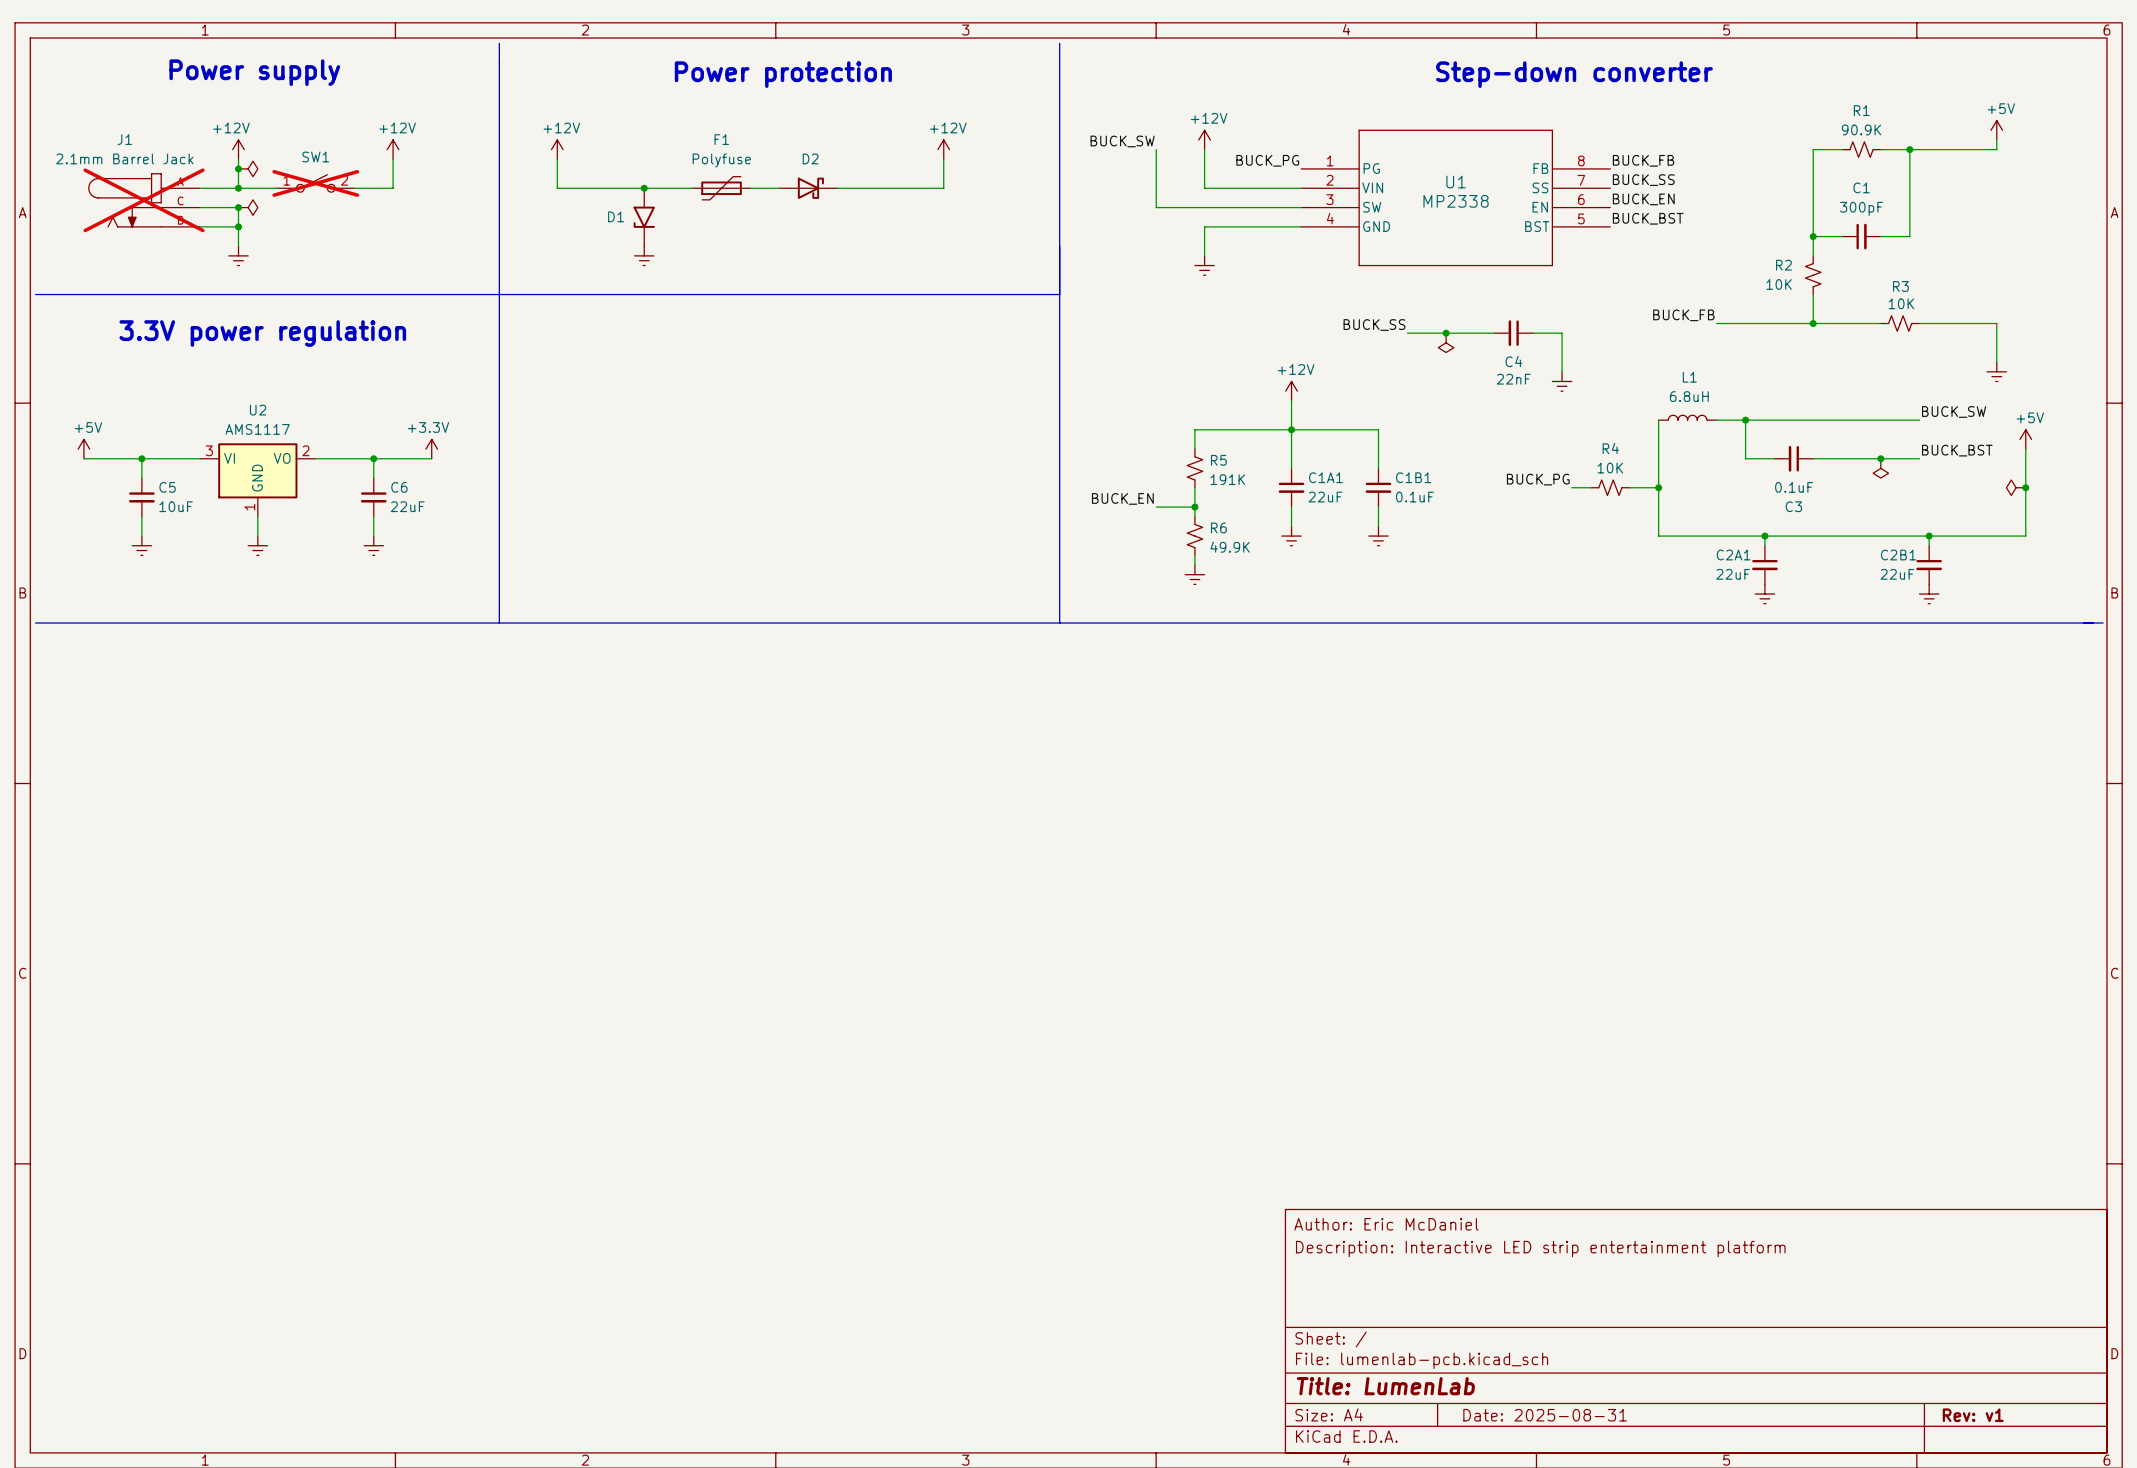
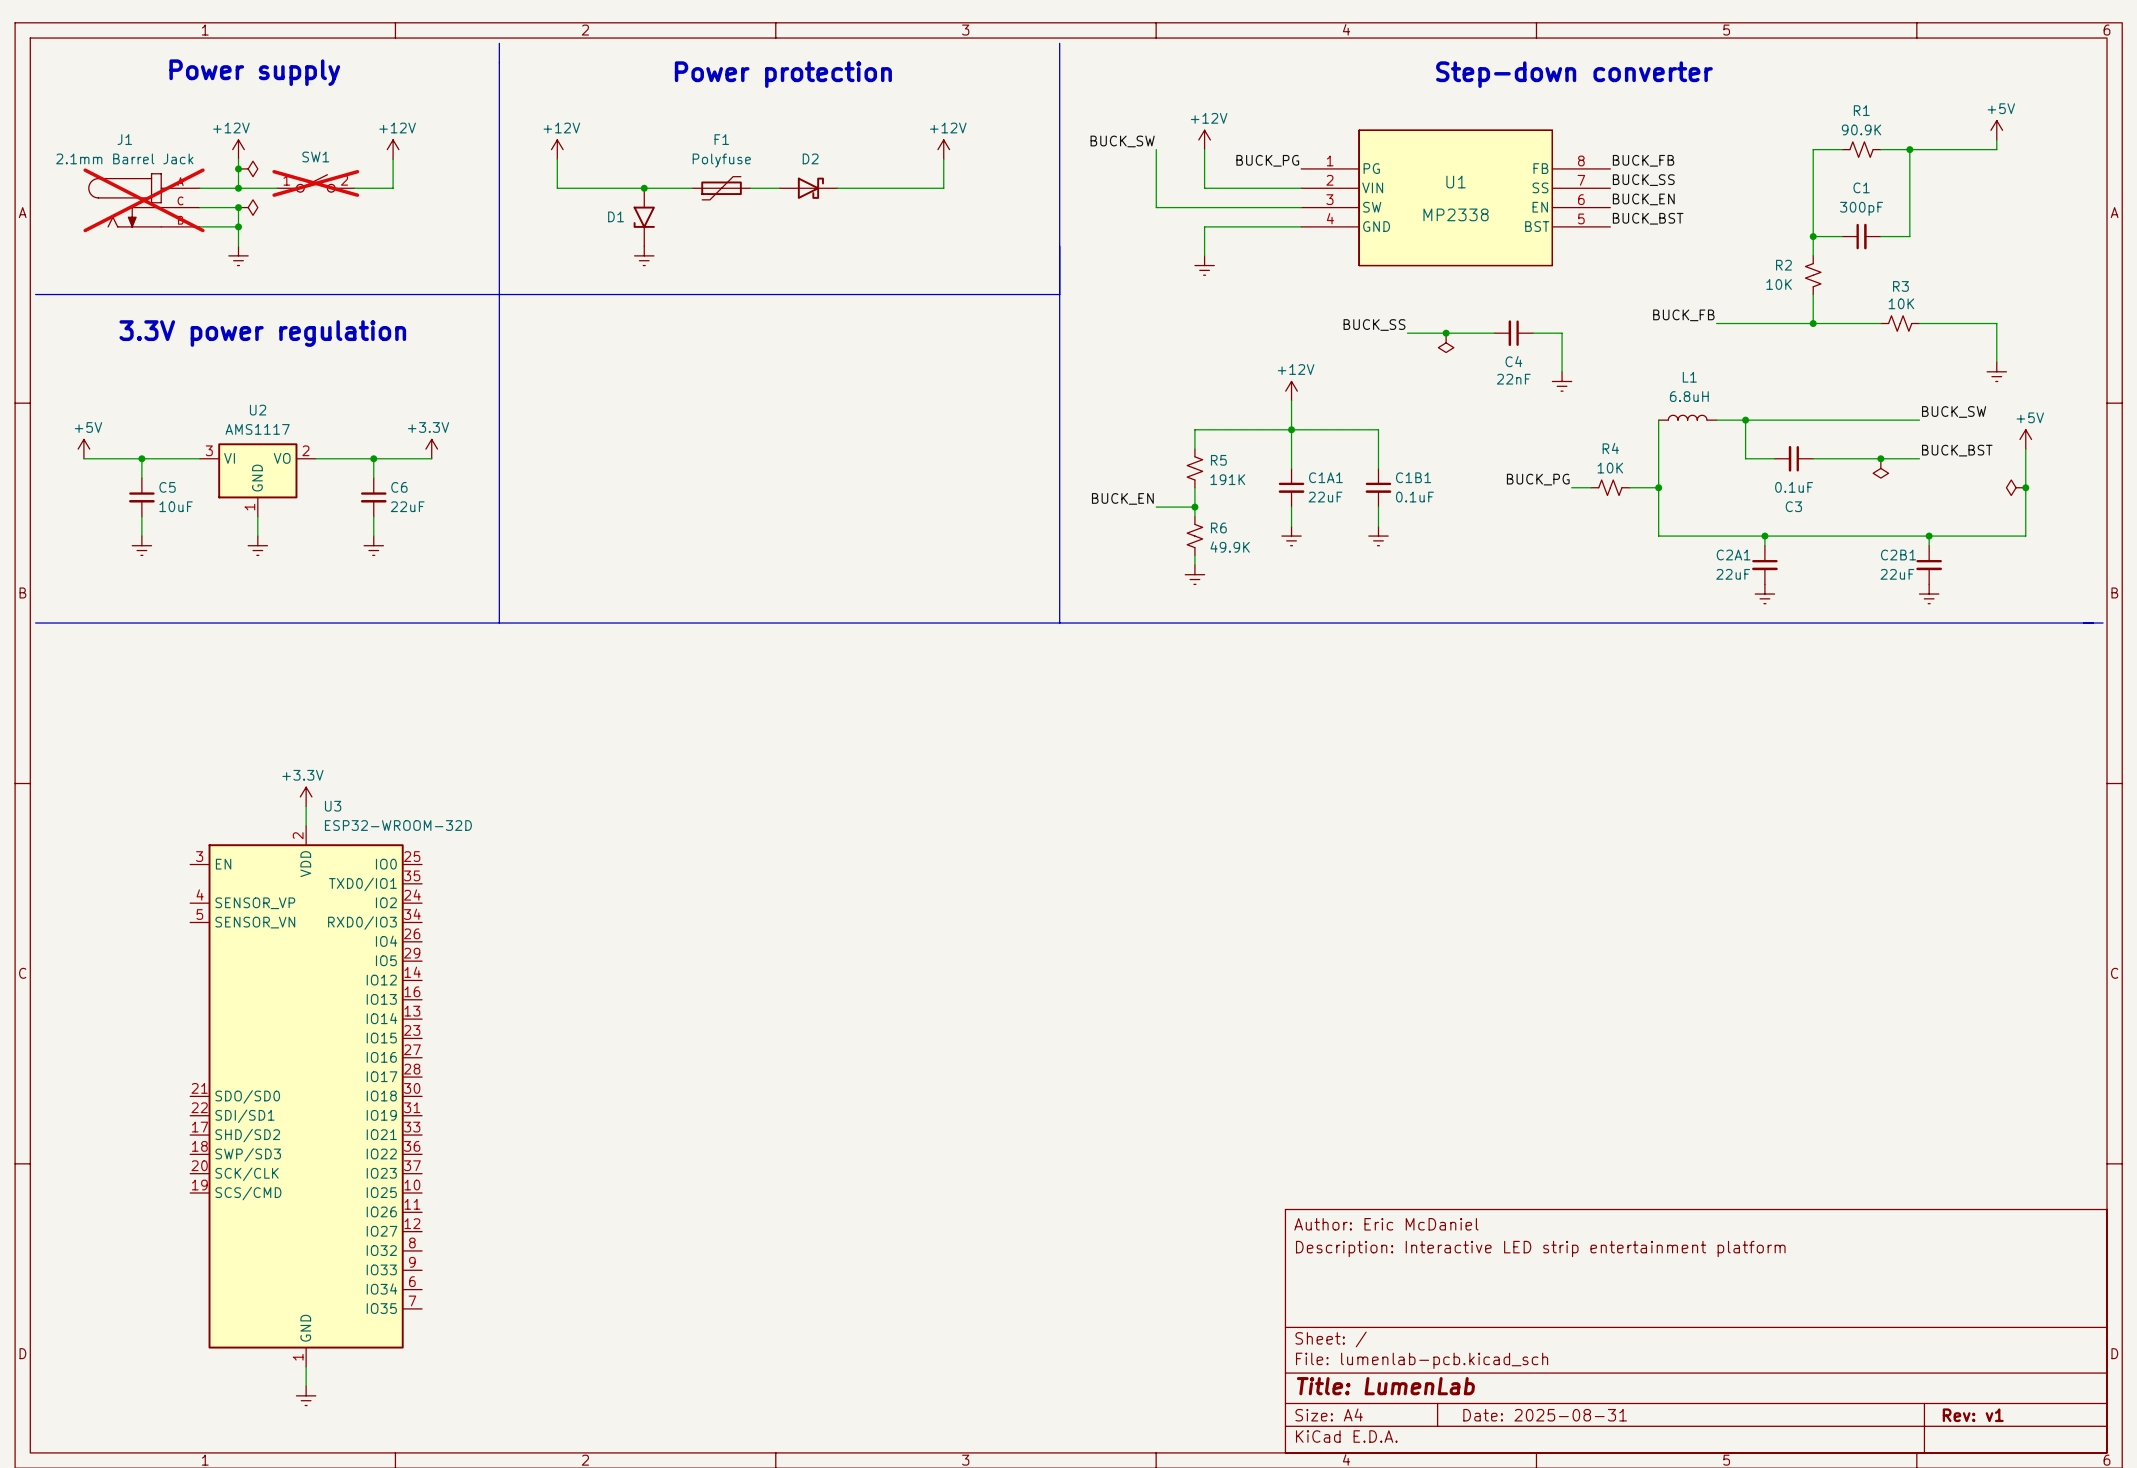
U1 symbol: [1301, 129, 1611, 267] -> [1301, 129, 1611, 267]
power symbol: none -> +3.3V (306, 796)
wire: none -> (306, 806) (306, 825)
U3: none -> ESP32-WROOM-32D (306, 1096)
wire: none -> (306, 1366) (306, 1386)
power symbol: none -> (306, 1395)

